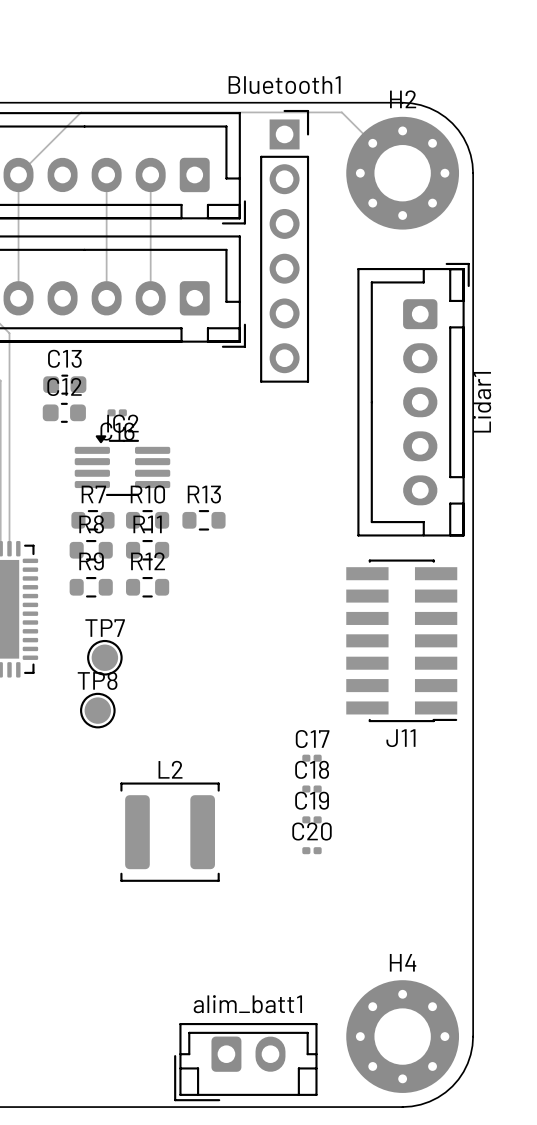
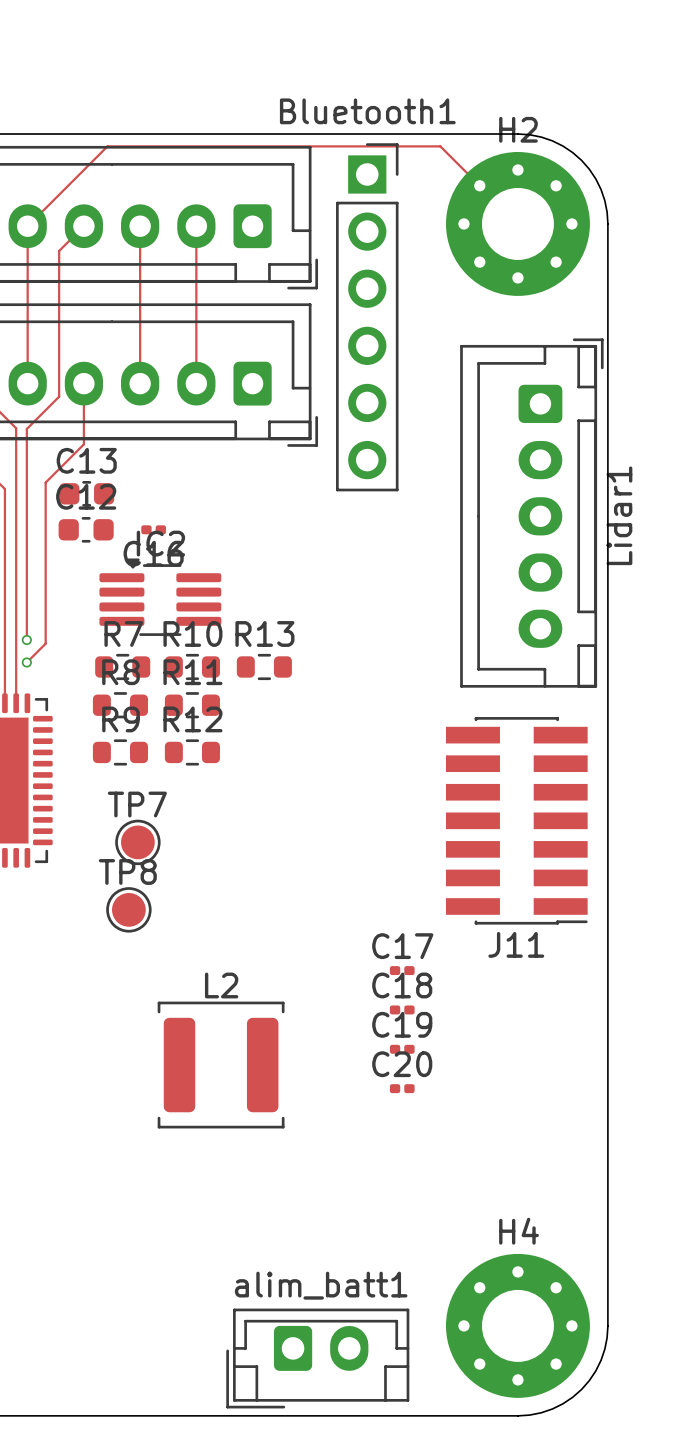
track: none -> (83, 226) (59, 250) (59, 396) (26, 429) (26, 640)
track: none -> (83, 383) (83, 444) (45, 482) (45, 643) (26, 662)
via: none -> (26, 640)
via: none -> (26, 662)

